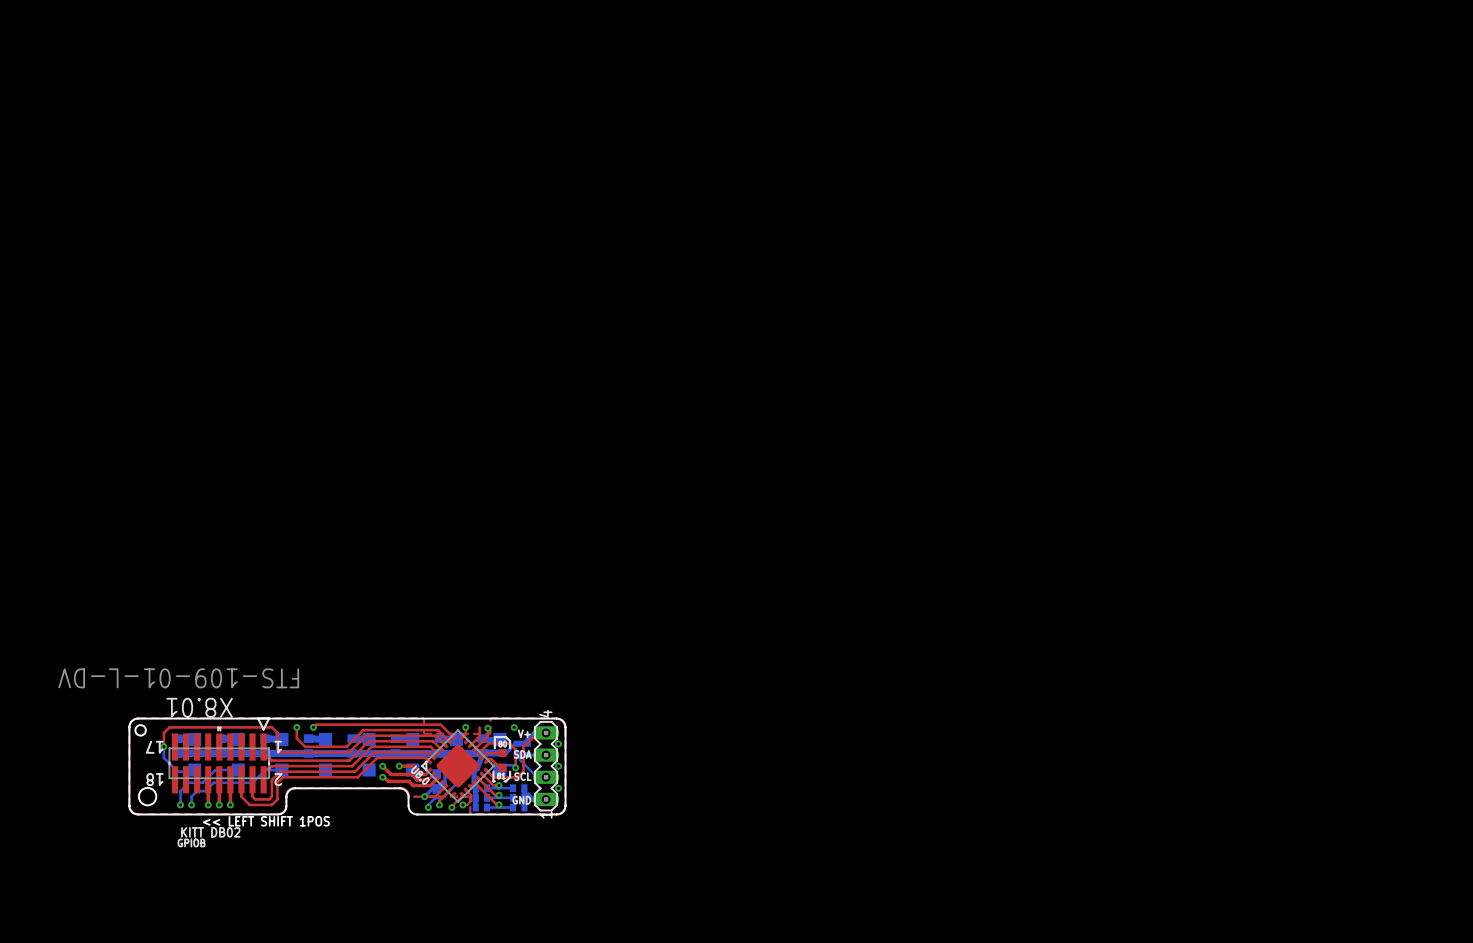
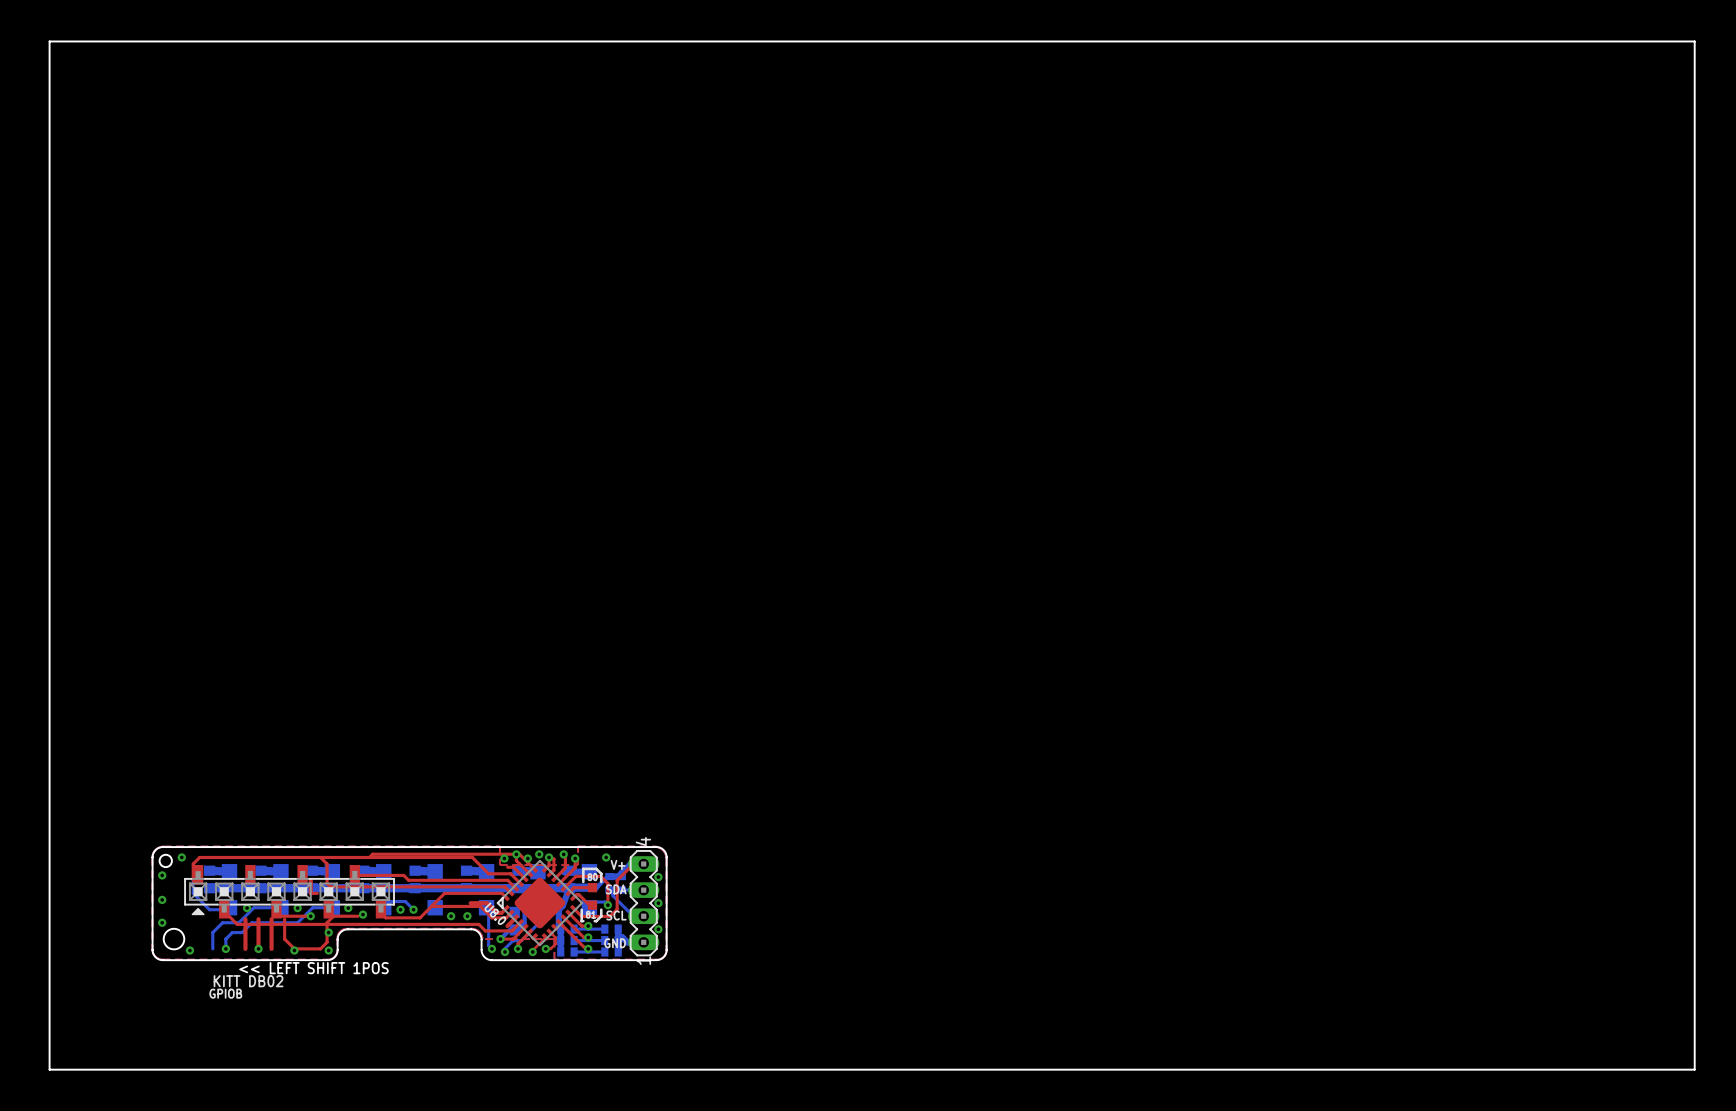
board edge: none -> (49, 41) (1694, 41) (1694, 1069) (49, 1069) (49, 41)
via: none -> (516, 854)
via: none -> (539, 854)
via: none -> (563, 854)
via: none -> (181, 857)
top track: (296, 727) (296, 738) (305, 746) (346, 746) (363, 730) (438, 730) (442, 734) -> (516, 854) (516, 860) (521, 865)
via: (296, 727) -> none
via: (313, 727) -> none
via: none -> (504, 858)
via: none -> (527, 858)
top track: none -> (552, 858) (553, 859) (553, 870) (550, 873)
top track: (430, 735) (366, 735) (349, 752) -> (441, 886) (411, 886)
top track: (414, 741) (368, 741) (349, 760) (271, 760) (269, 757) -> (488, 873) (472, 857) (320, 857)
via: none -> (162, 875)
via: (163, 746) -> none
top track: (371, 746) (352, 766) (271, 766) (269, 768) (263, 768) (263, 779) -> (438, 880) (408, 880) (403, 875) (355, 875)
top track: (374, 752) (355, 771) (280, 771) (271, 780) (271, 796) (269, 799) (255, 799) (252, 796) (252, 779) -> none
X8.01: FTS-109-01-L-DV (219, 755) -> none
part: none -> (289, 891)
via: none -> (162, 899)
top track: (382, 766) (391, 774) (411, 774) (417, 780) (429, 778) -> (431, 906) (480, 906) (491, 917) (506, 917)
via: (382, 766) -> none
via: (399, 766) -> none
top track: none -> (224, 908) (224, 911) (237, 924) (478, 924) (485, 930) (512, 930) (520, 922)
via: none -> (247, 908)
top track: none -> (276, 908) (276, 916) (310, 916)
via: none -> (297, 908)
via: none -> (348, 908)
bottom track: none -> (383, 907) (390, 901) (405, 901) (413, 909)
via: none -> (400, 909)
via: none -> (413, 909)
bottom track: none -> (491, 913) (486, 907) (488, 909) (488, 945) (491, 948)
via: none -> (362, 914)
via: none -> (310, 916)
top track: (303, 777) (357, 777) -> (384, 903) (380, 908) (385, 917) (420, 917) (421, 916)
top track: (382, 777) (388, 781) (409, 781) (413, 785) (430, 785) -> none
via: none -> (467, 916)
via: none -> (162, 922)
via: none -> (328, 932)
via position: (180, 804) -> (189, 950)
via: (208, 804) -> none
via position: (230, 804) -> (294, 950)
via: none -> (491, 948)
via: none -> (328, 950)

